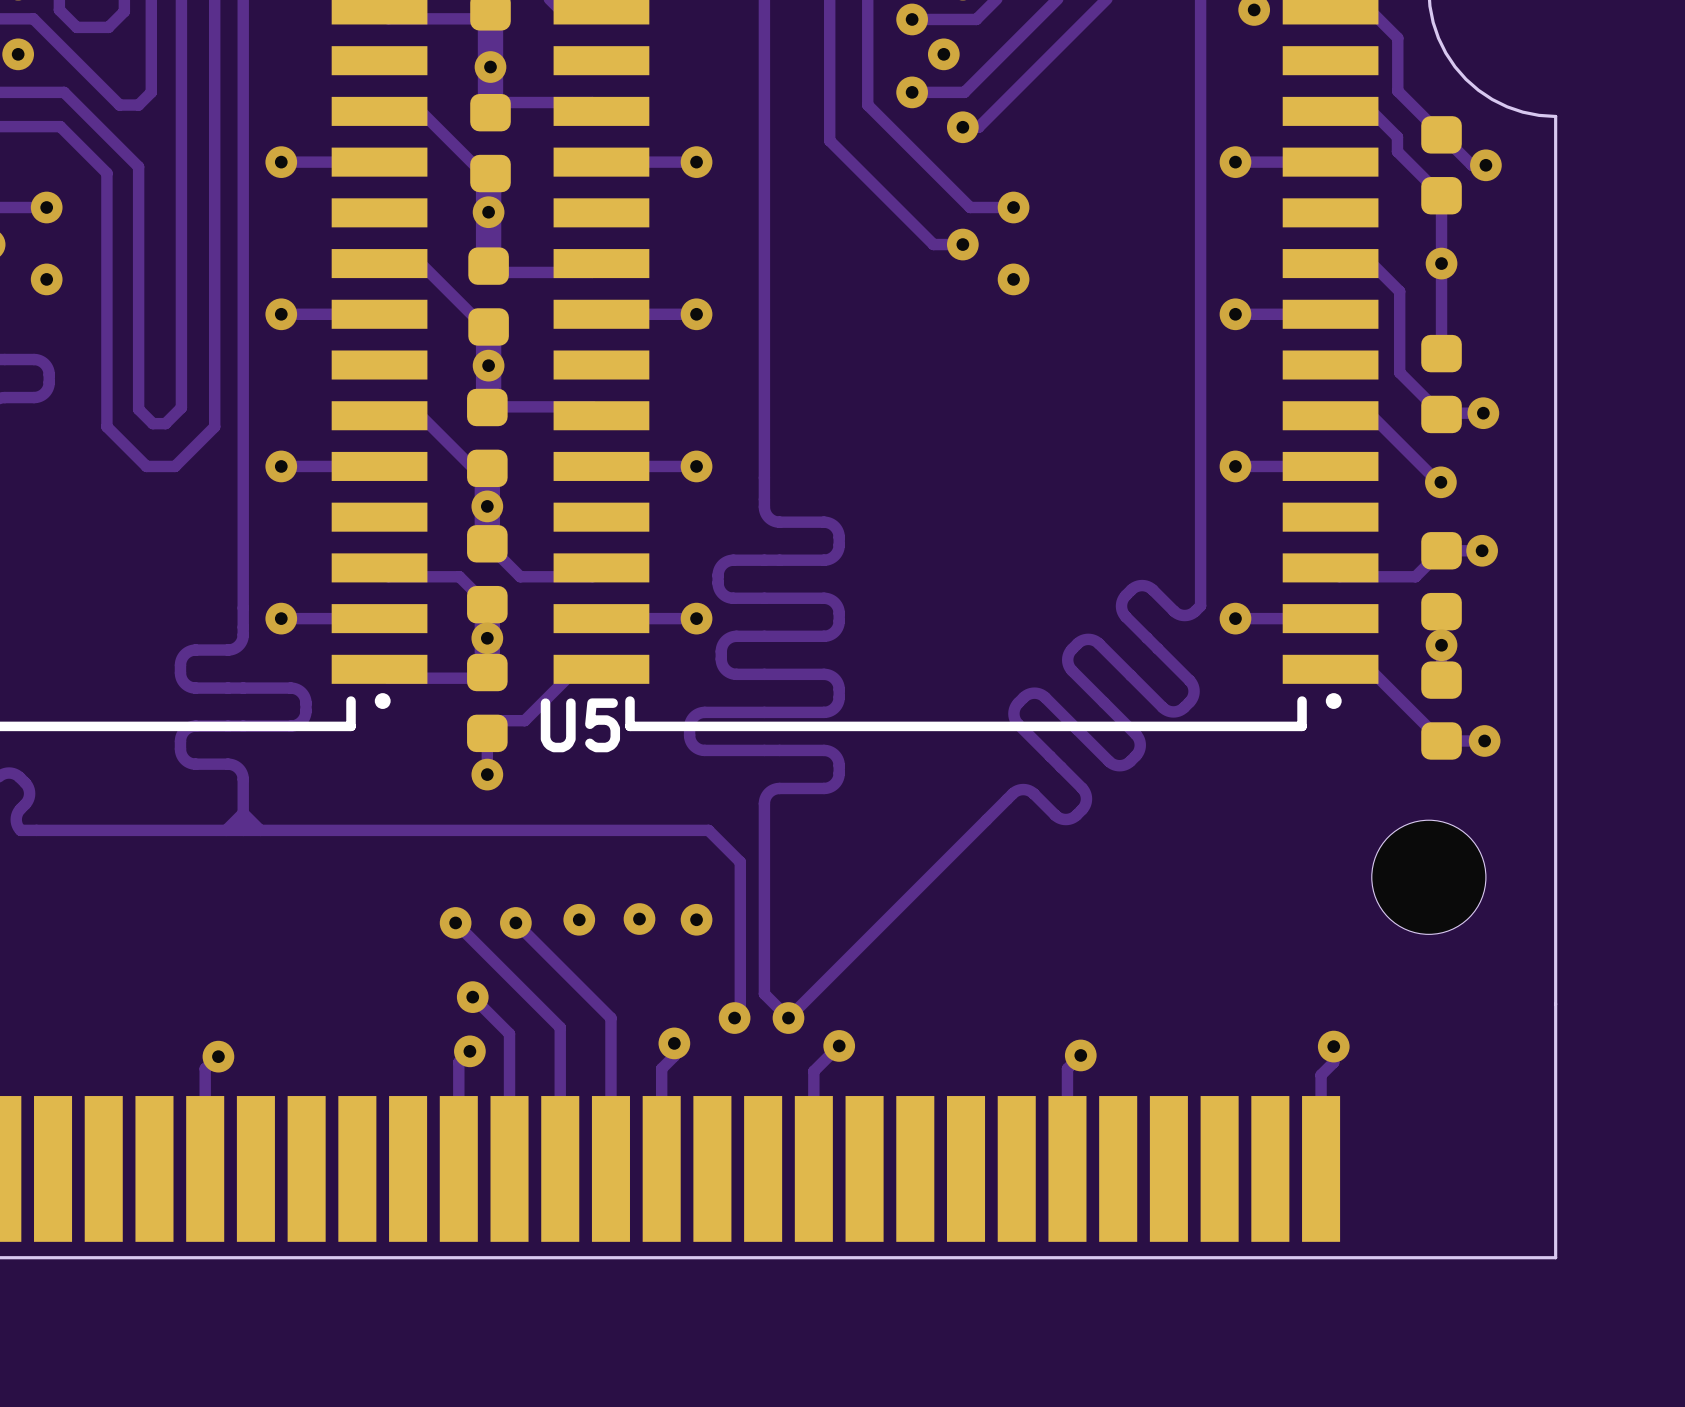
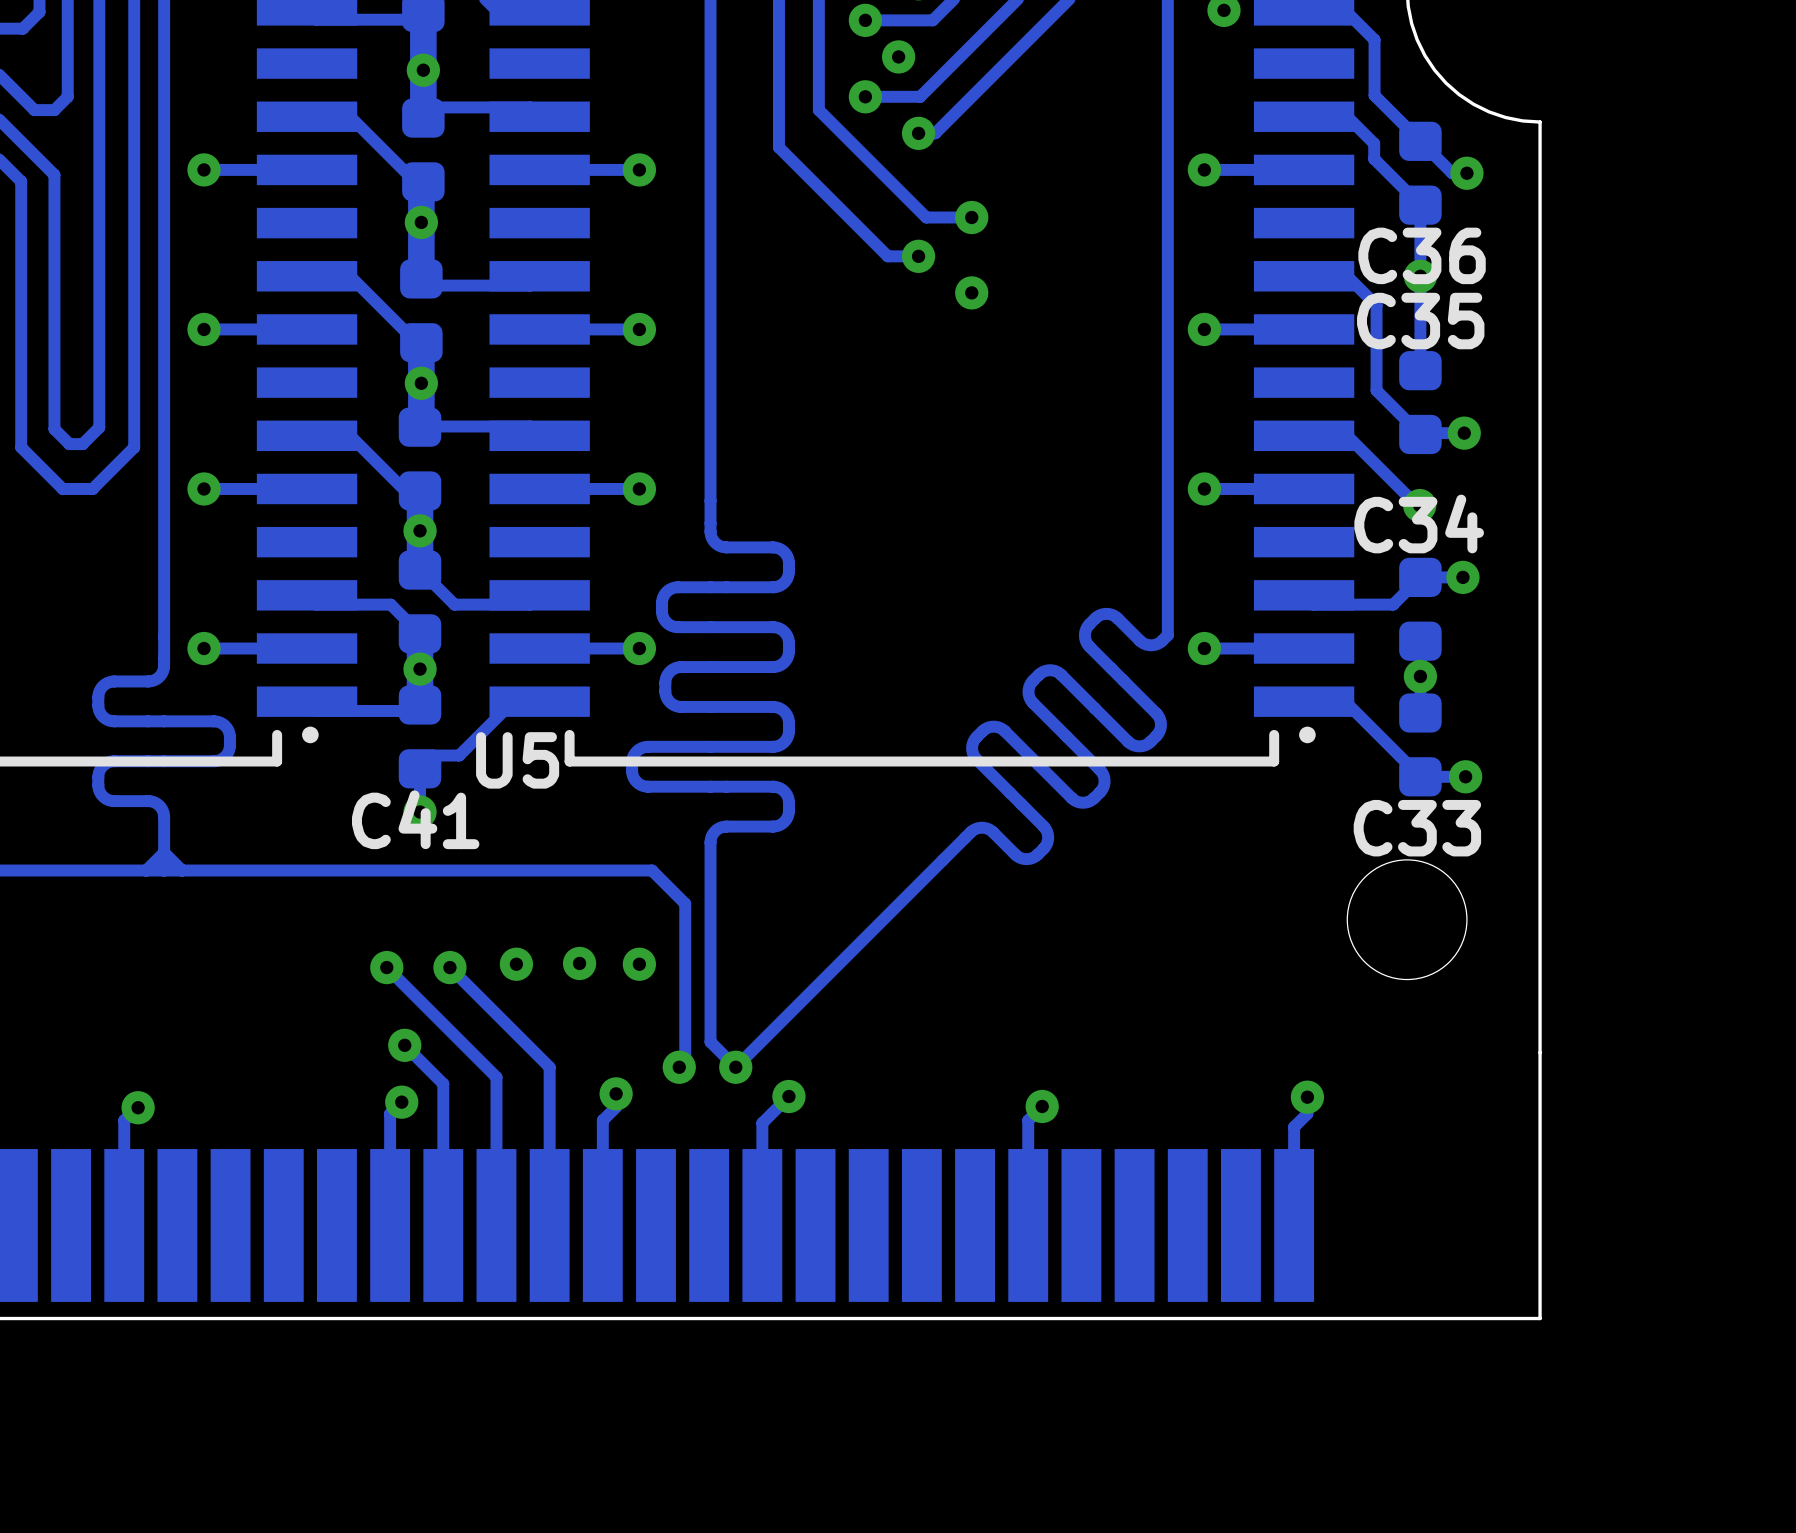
C36 name: none -> C36 (1422, 255)
C35 name: none -> C35 (1420, 321)
C34 name: none -> C34 (1419, 523)
C41 name: none -> C41 (415, 819)
C33 name: none -> C33 (1417, 828)

